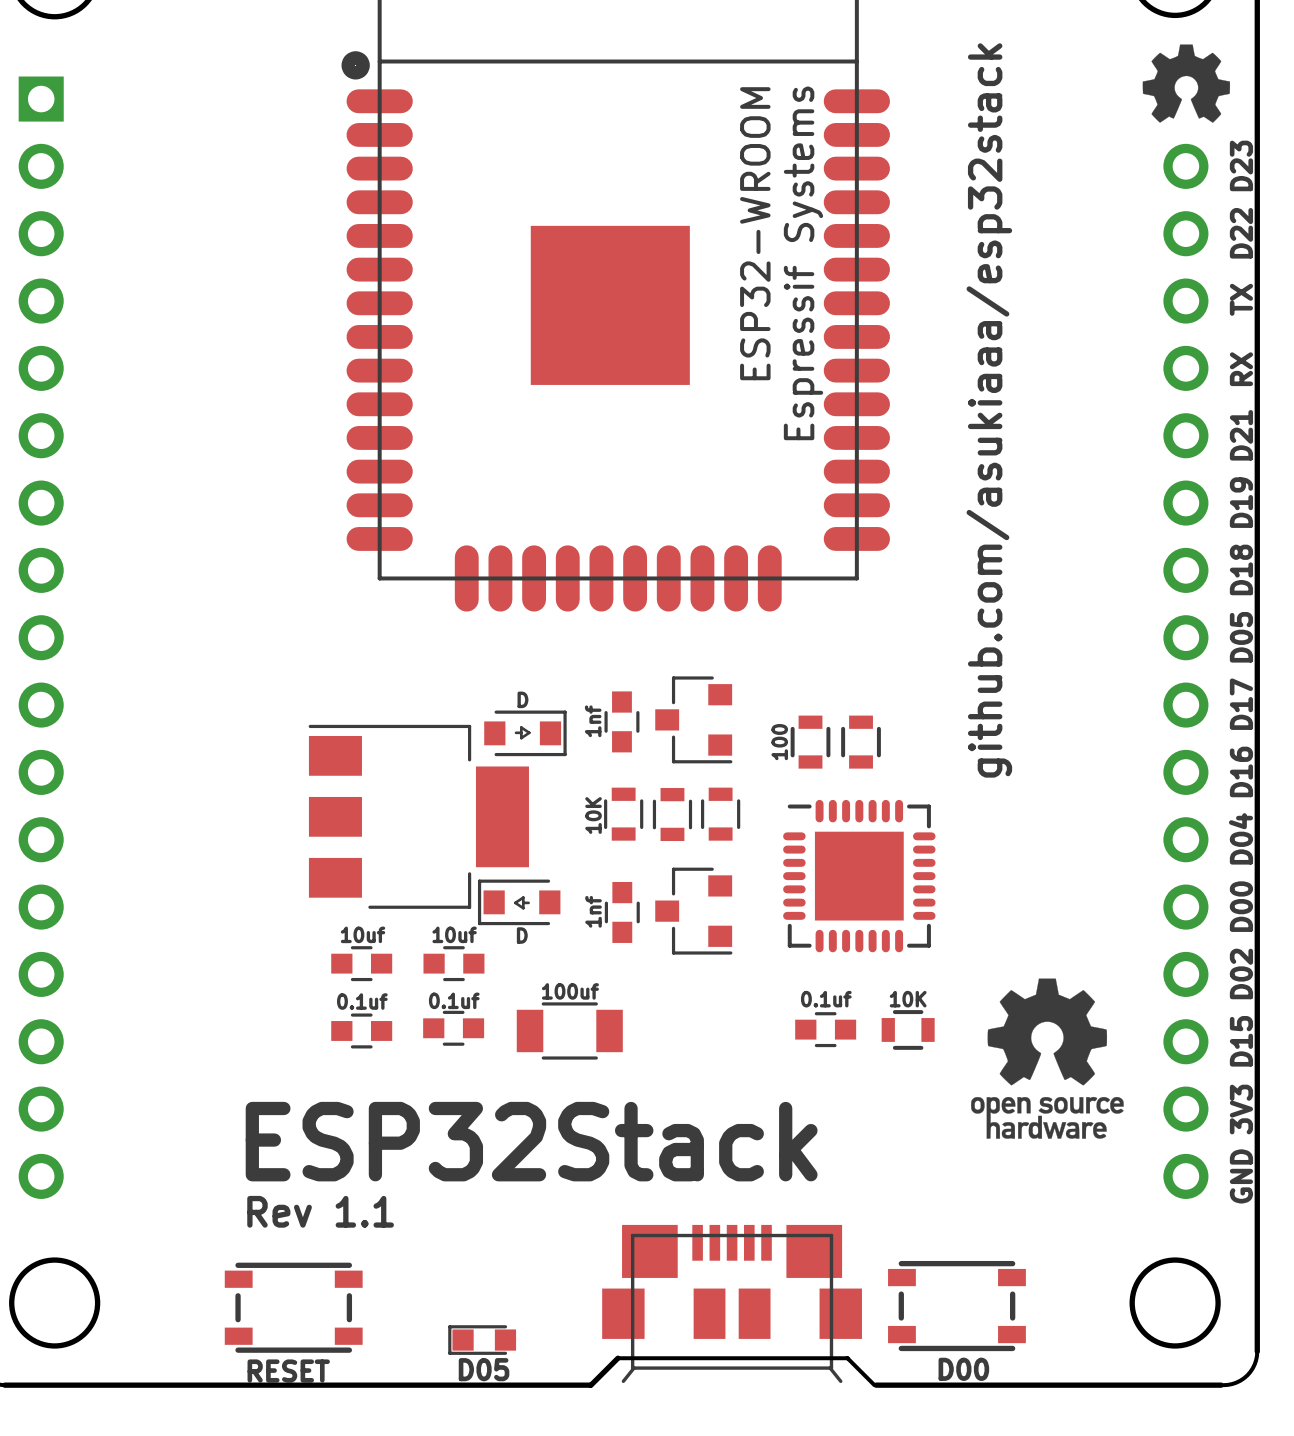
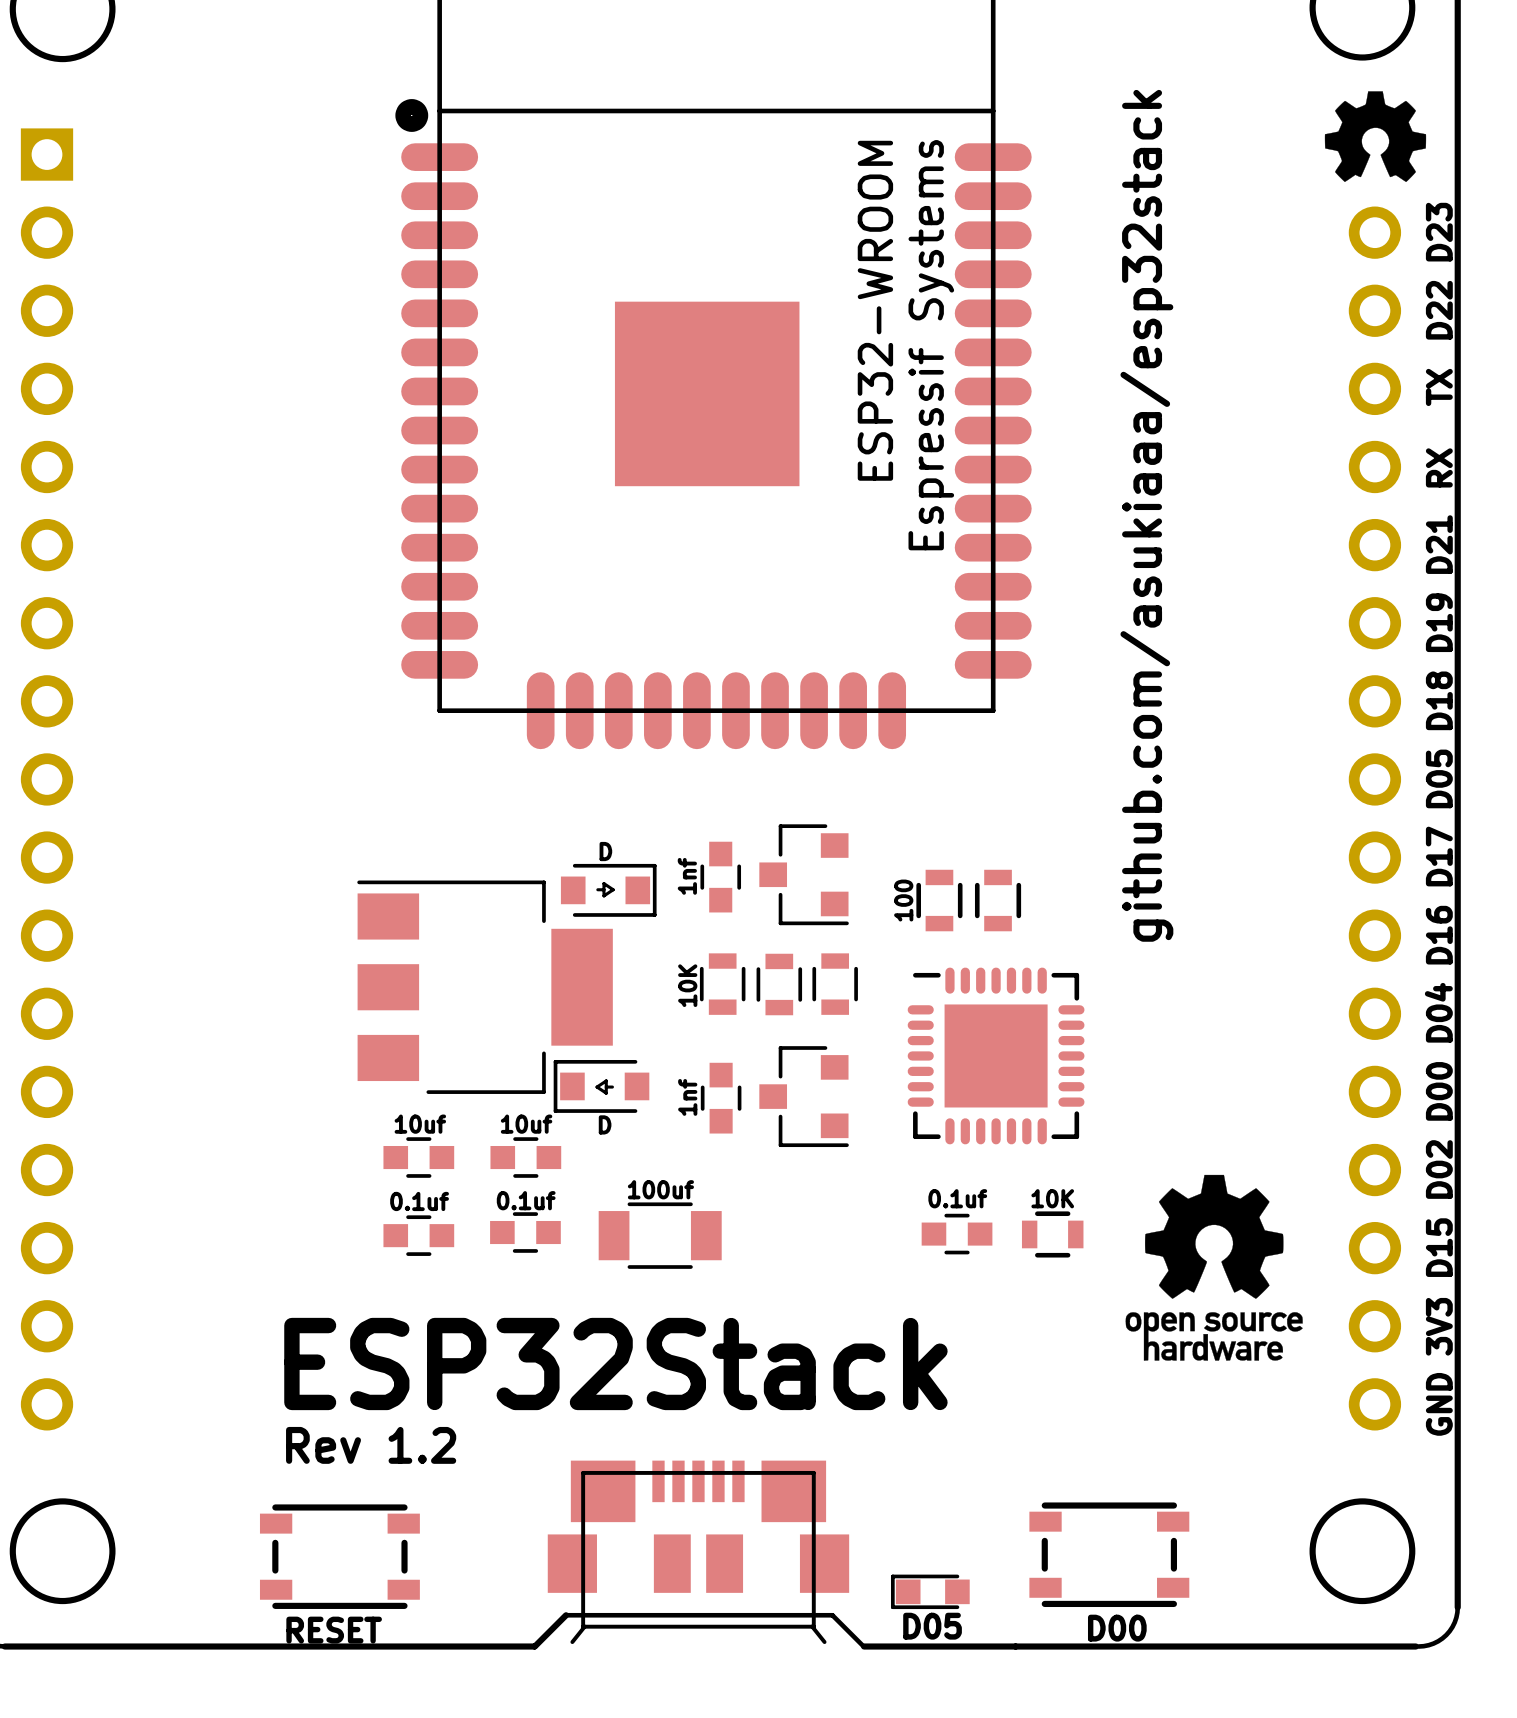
text: Rev 1.1 (320, 1211) -> Rev 1.2 (371, 1445)
part position: (732, 1303) -> (698, 1552)
part position: (482, 1340) -> (930, 1591)
board edge: (617, 1358) (591, 1385) -> (716, 1615) (566, 1615)
board edge: (718, 1358) (847, 1358) (874, 1385) -> (832, 1615) (863, 1646)
board edge: (461, 1385) (590, 1385) -> (534, 1646) (566, 1615)
board edge: none -> (864, 1646) (1015, 1646)

